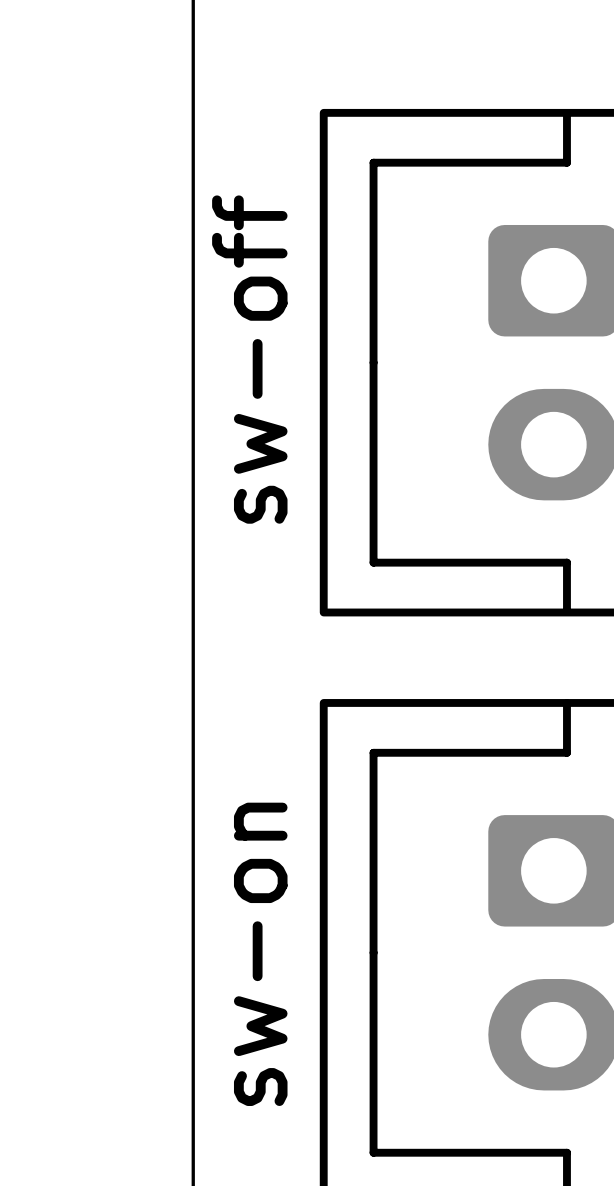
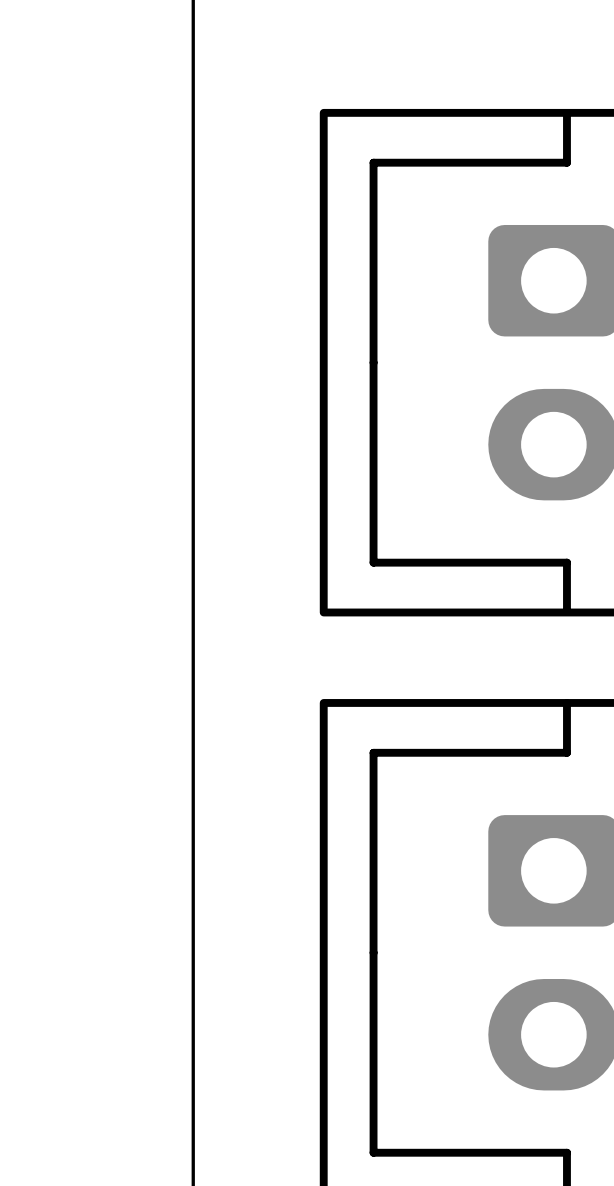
part value: sw-off (249, 359) -> none
part value: sw-on (260, 954) -> none

